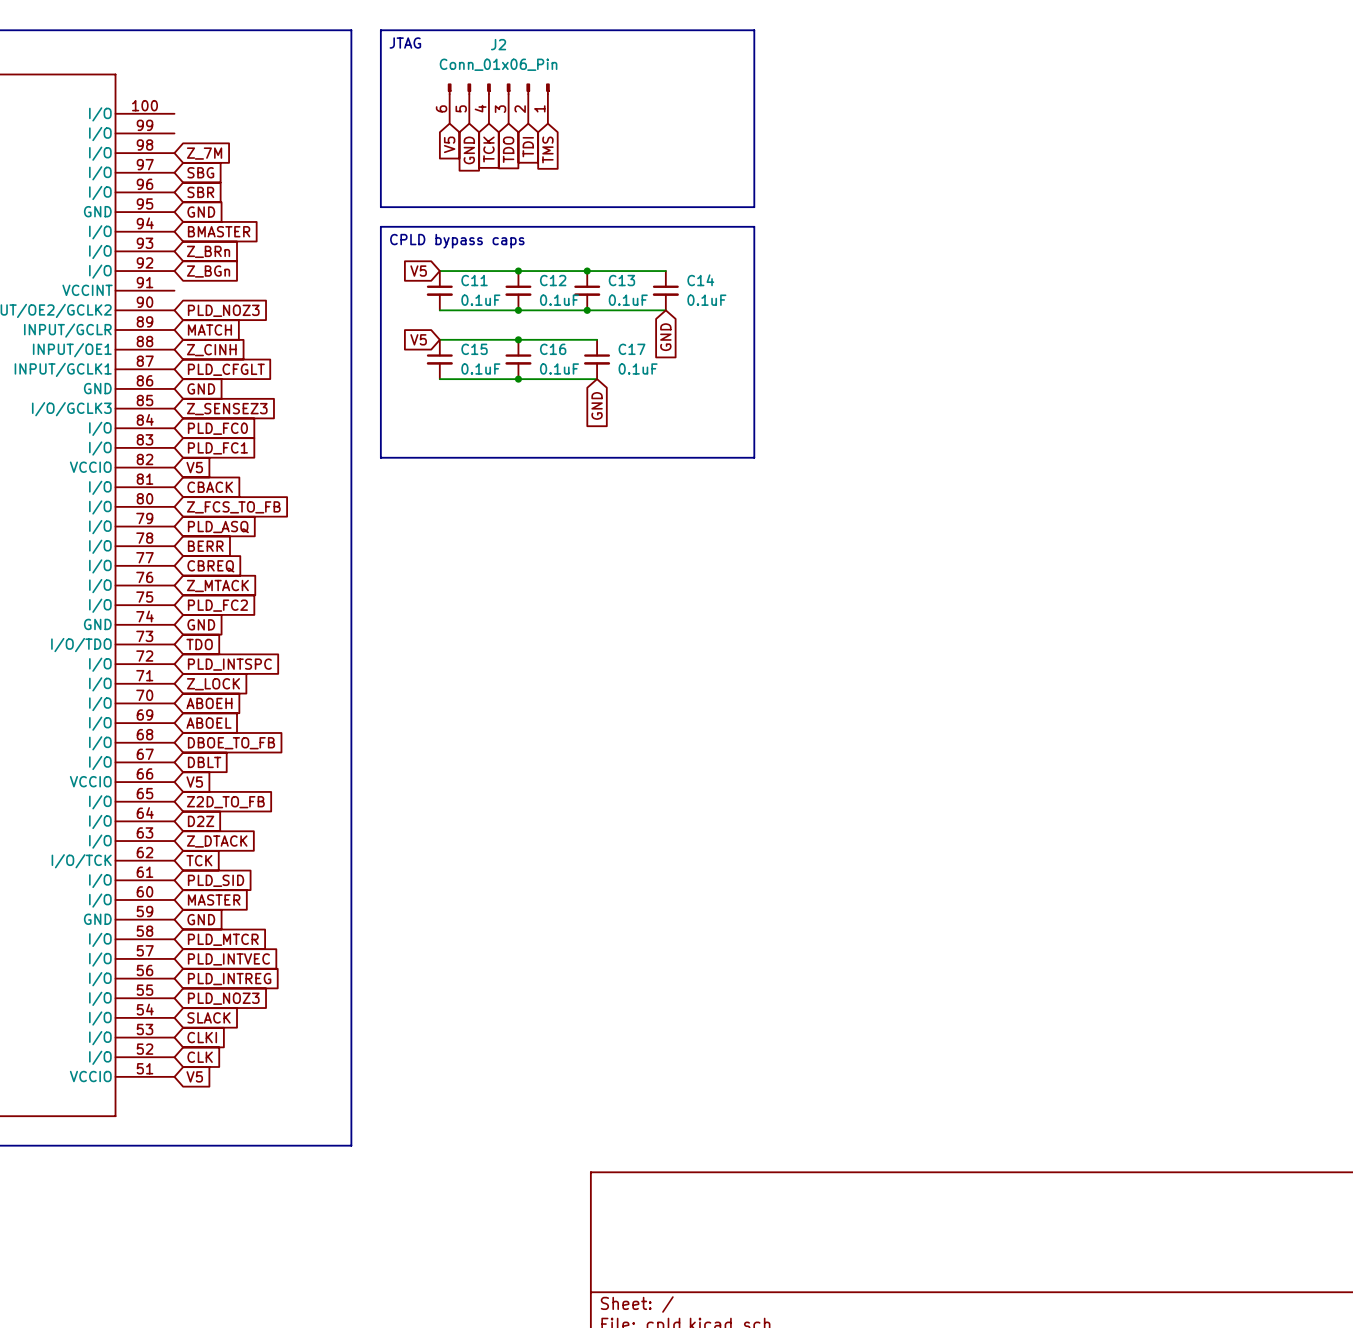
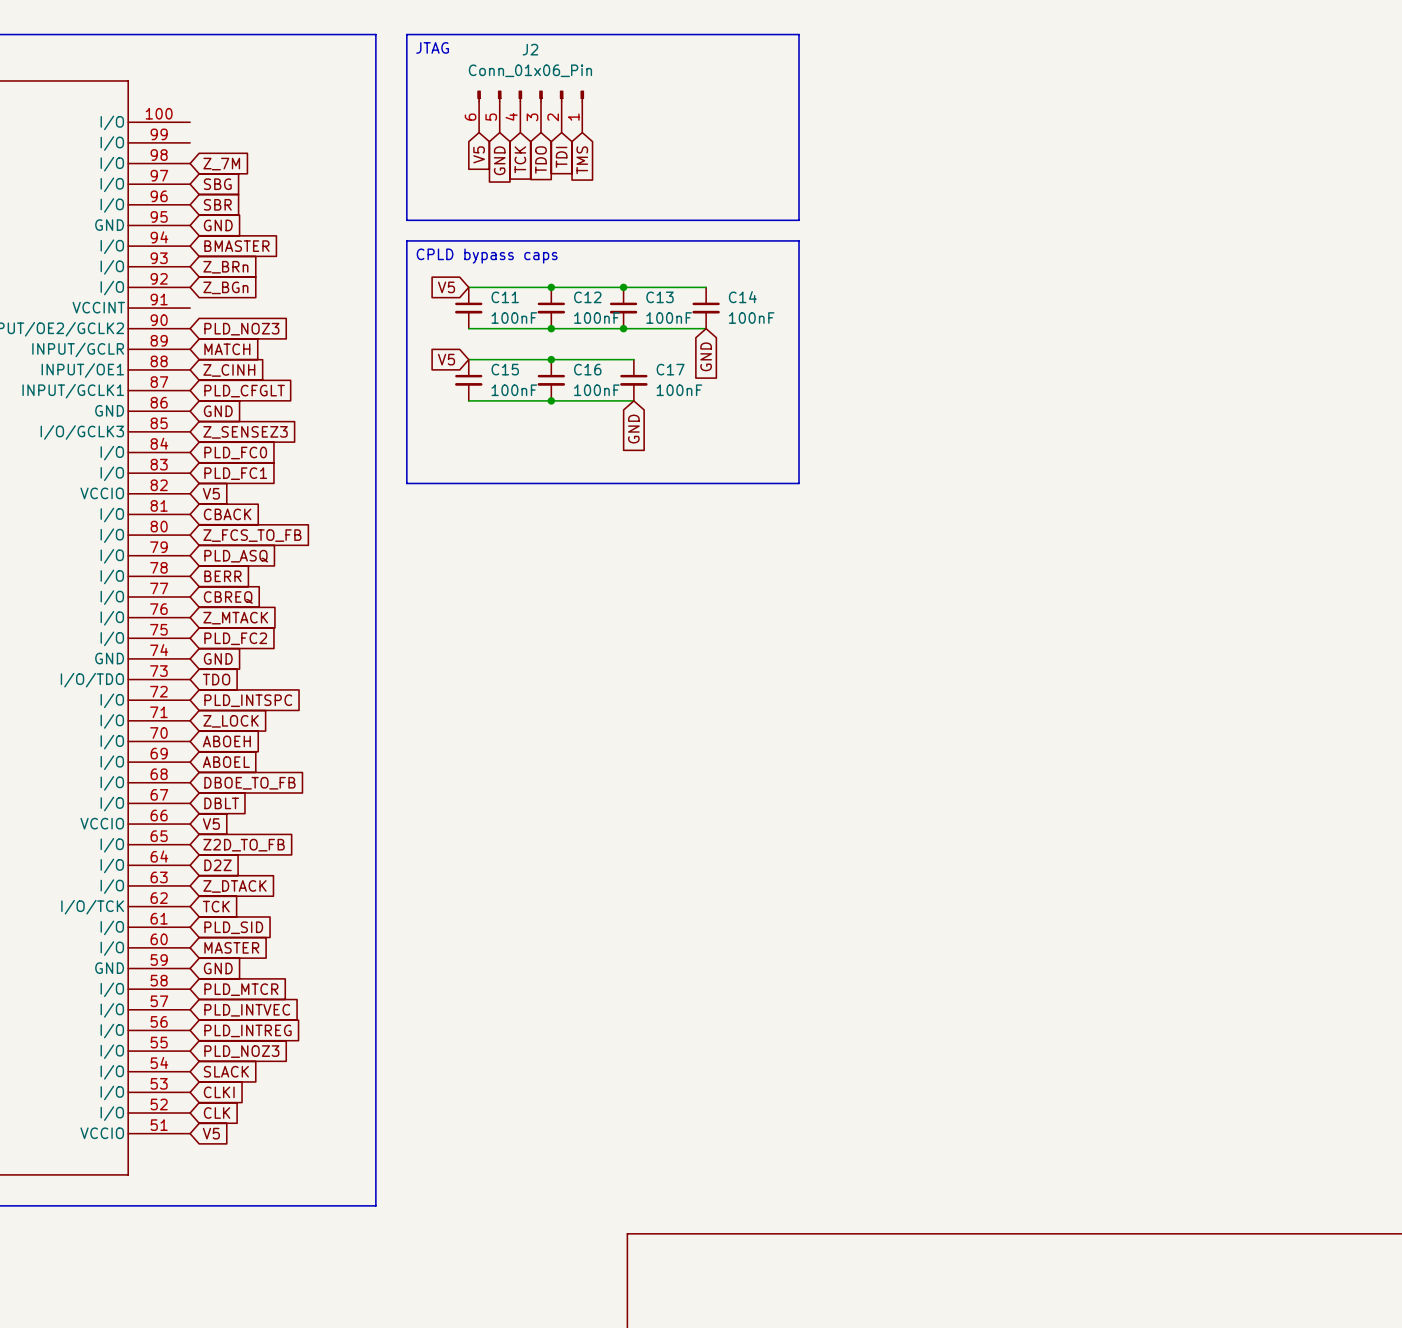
C11 value: 0.1uF (480, 300) -> 100nF (514, 318)
C12 value: 0.1uF (559, 300) -> 100nF (596, 318)
C13 value: 0.1uF (628, 300) -> 100nF (669, 318)
C14 value: 0.1uF (706, 300) -> 100nF (751, 318)
C15 value: 0.1uF (480, 368) -> 100nF (514, 390)
C16 value: 0.1uF (559, 368) -> 100nF (596, 390)
C17 value: 0.1uF (638, 368) -> 100nF (679, 390)

